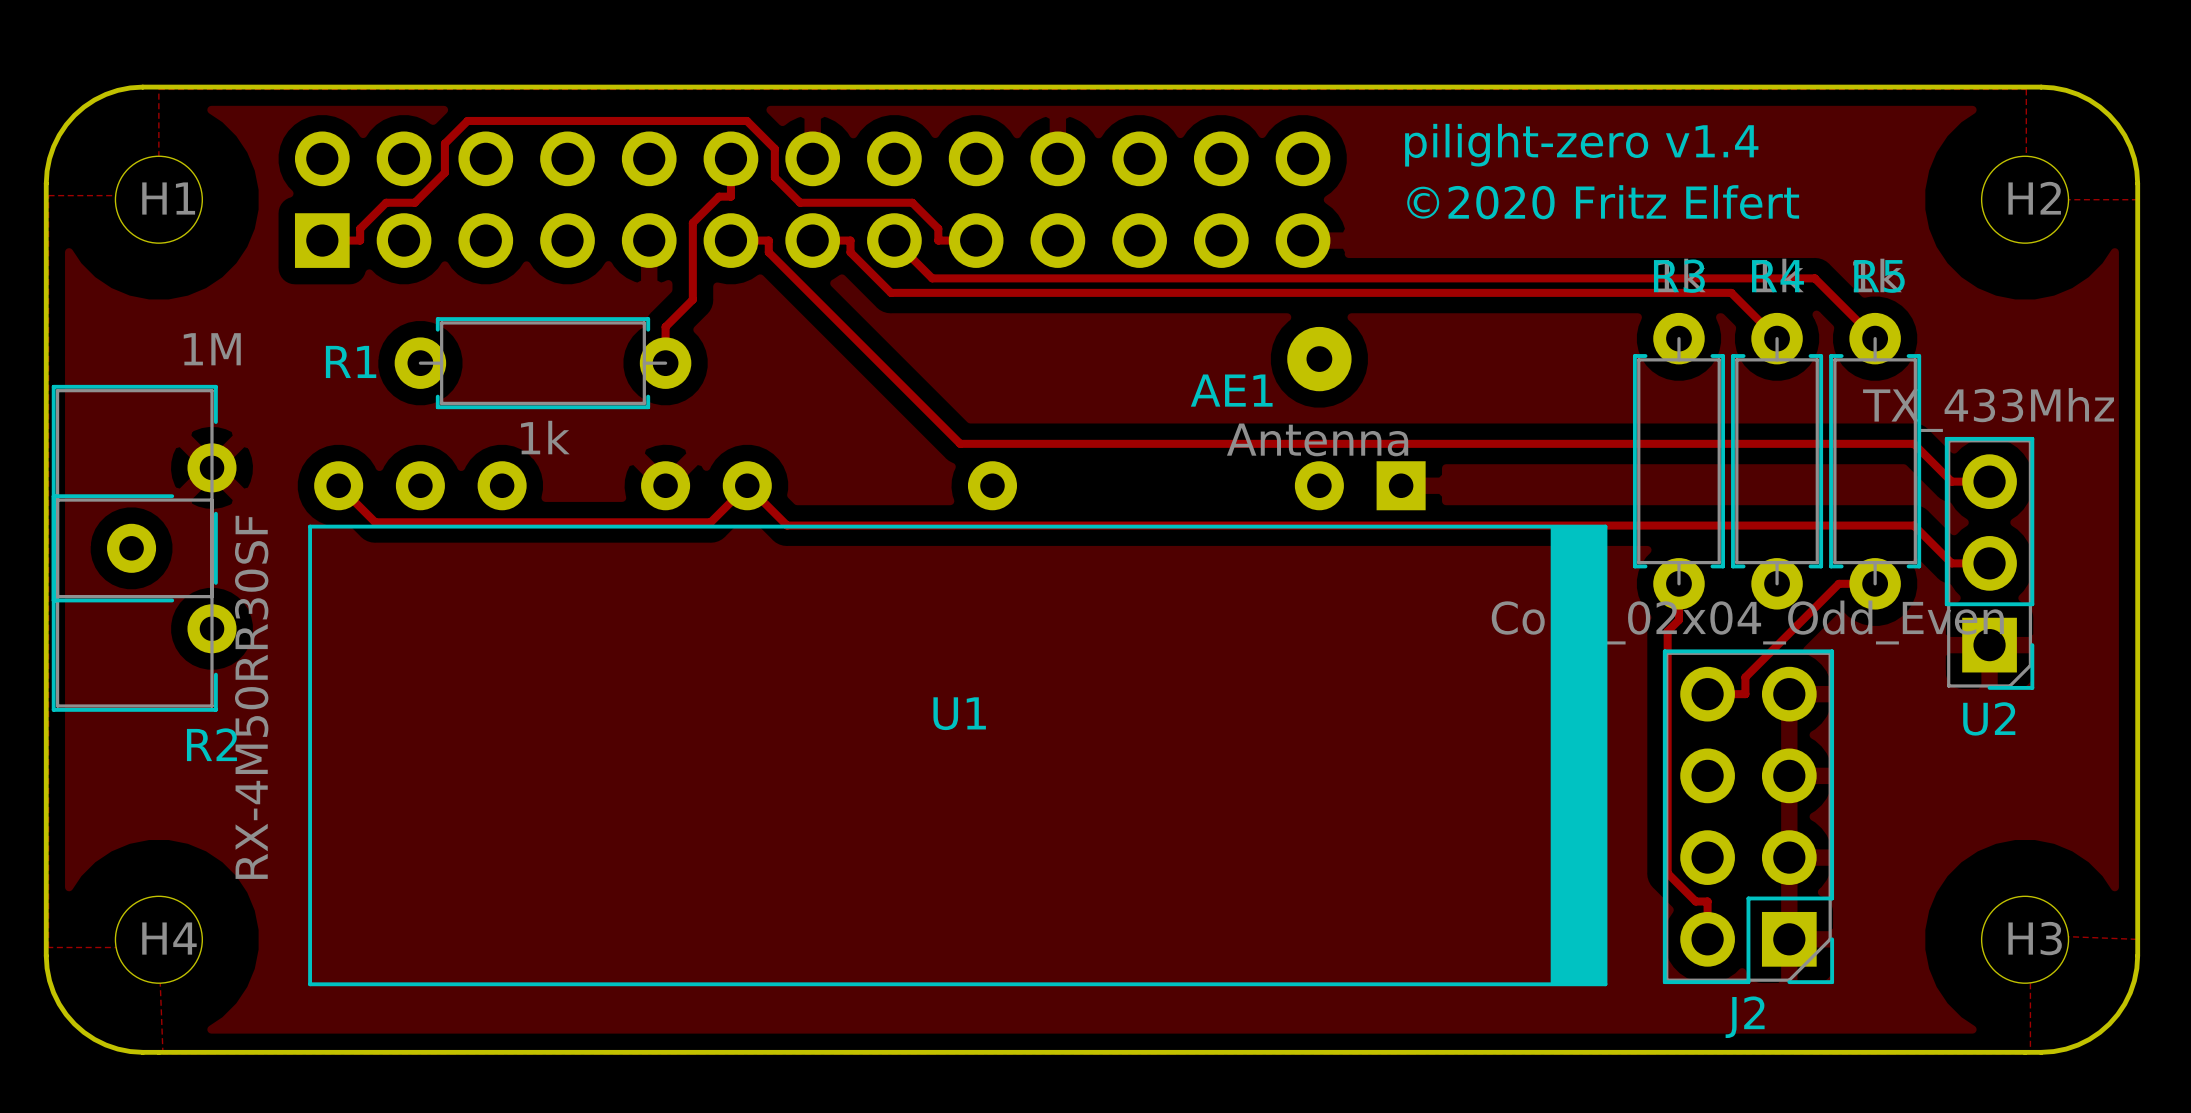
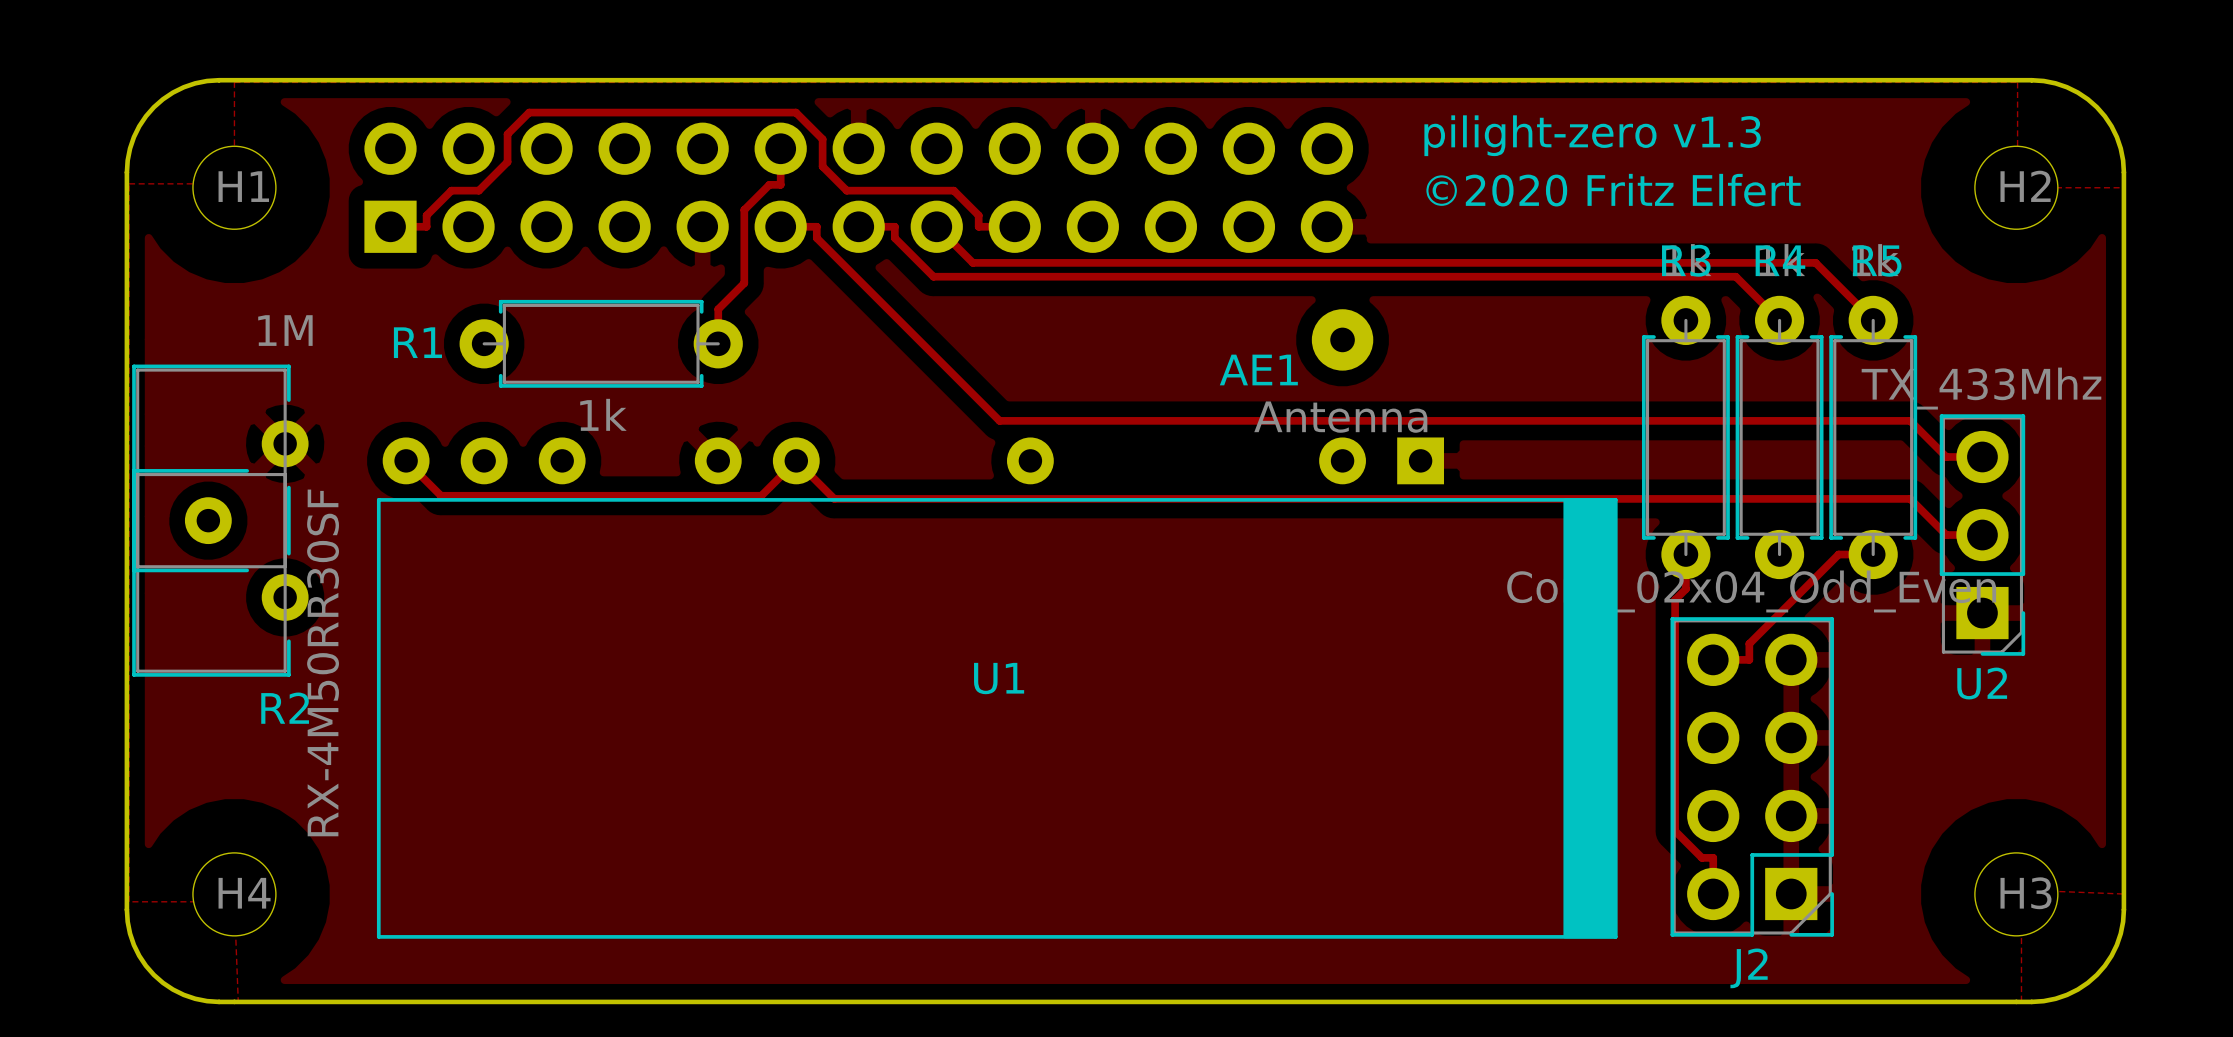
text: pilight-zero v1.4 (1581, 145) -> pilight-zero v1.3 (1592, 135)

